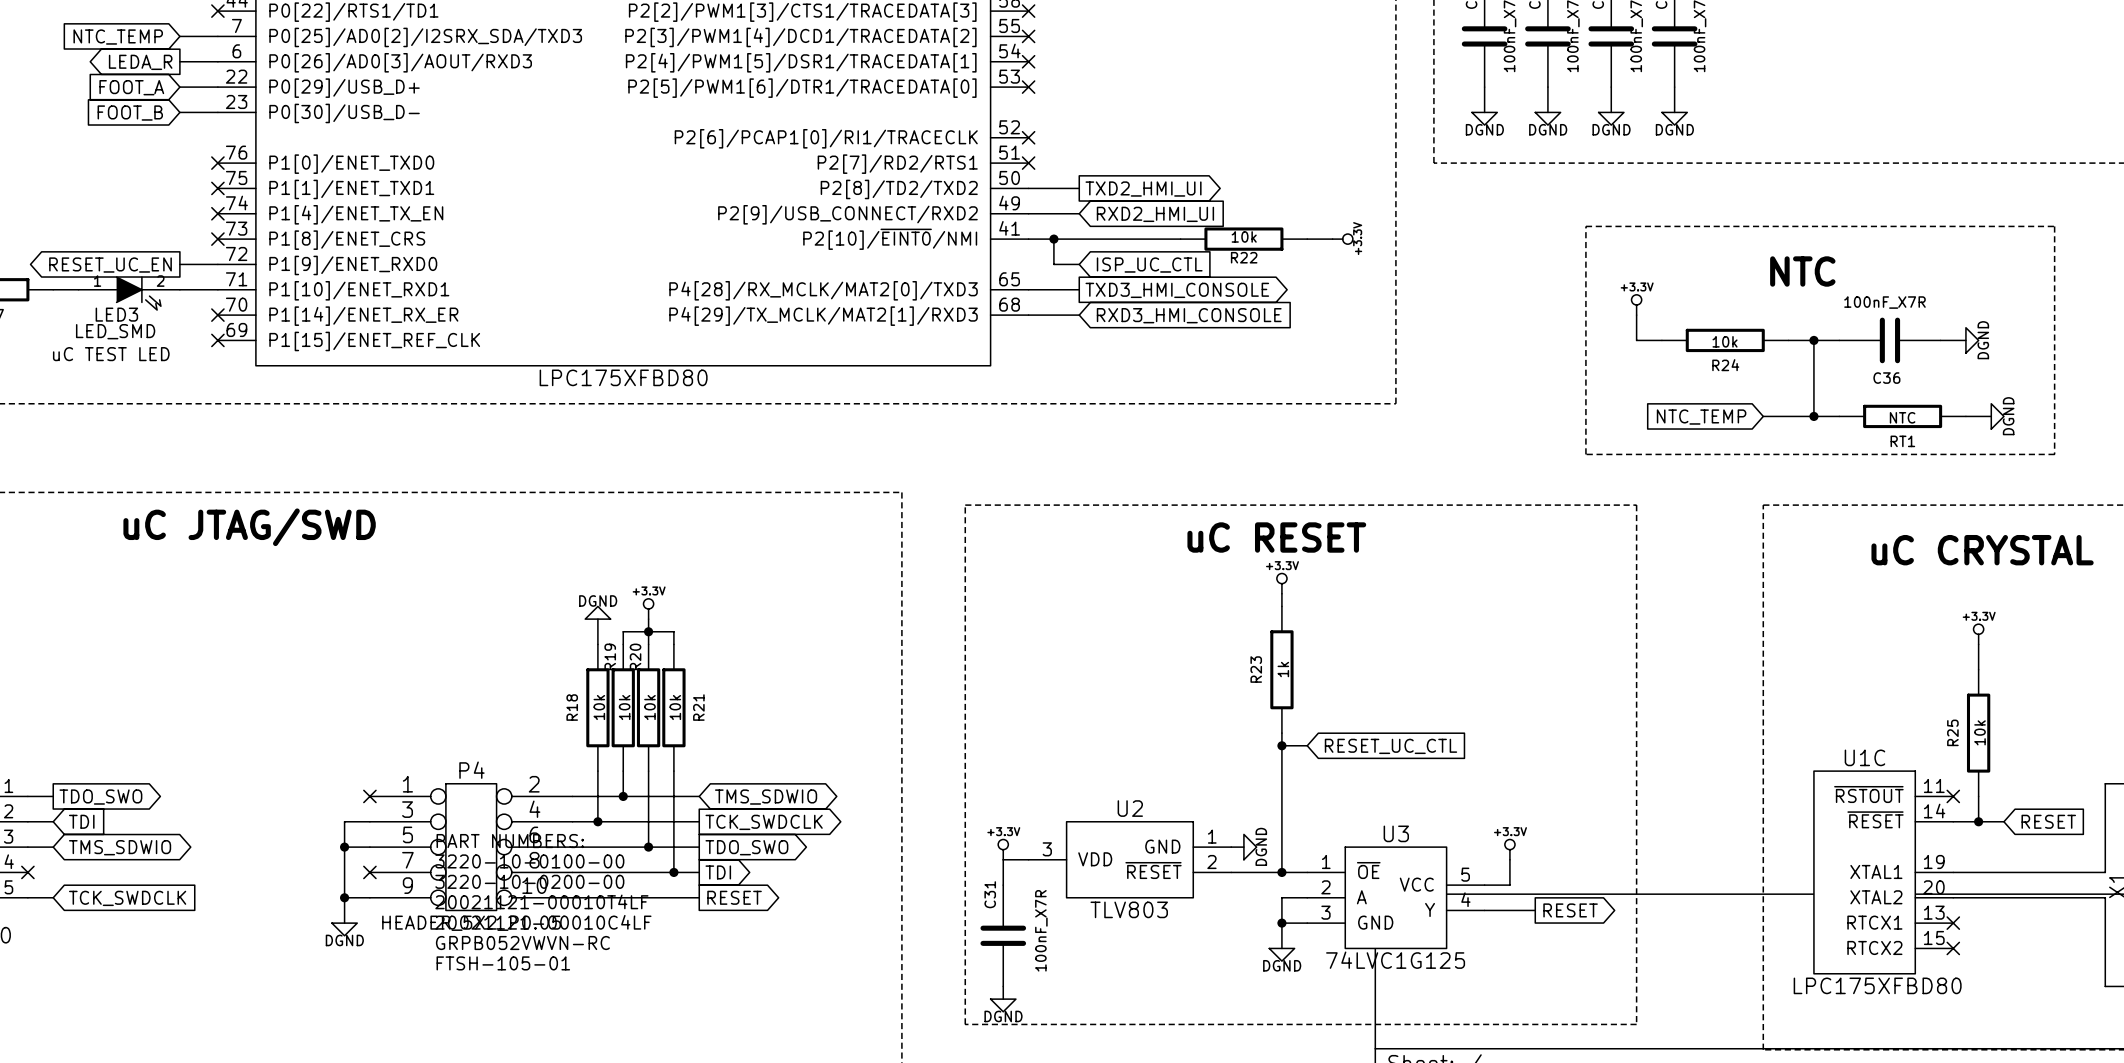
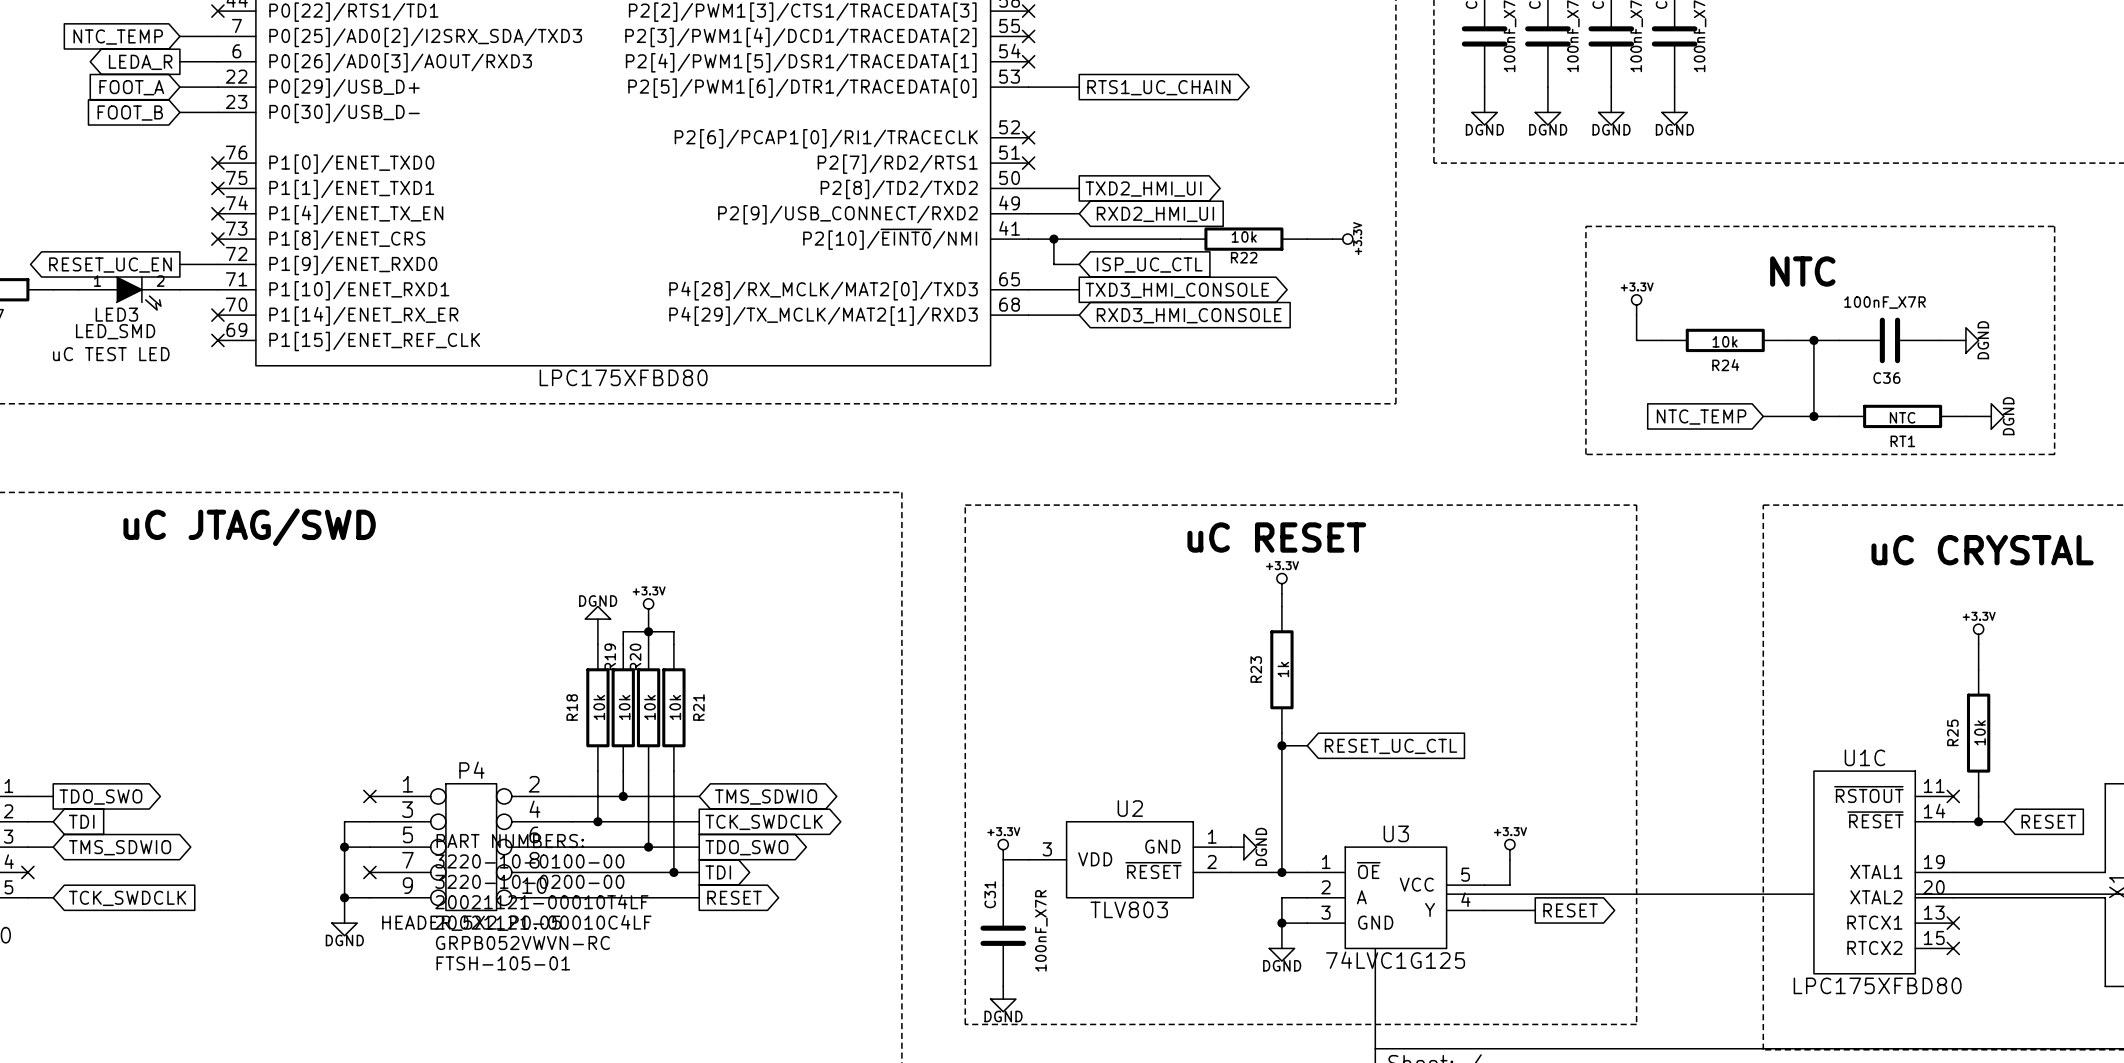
wire: none -> (1028, 87) (1079, 87)
no-connect mark: (1028, 87) -> none
global label: none -> RTS1_UC_CHAIN (1158, 87)

